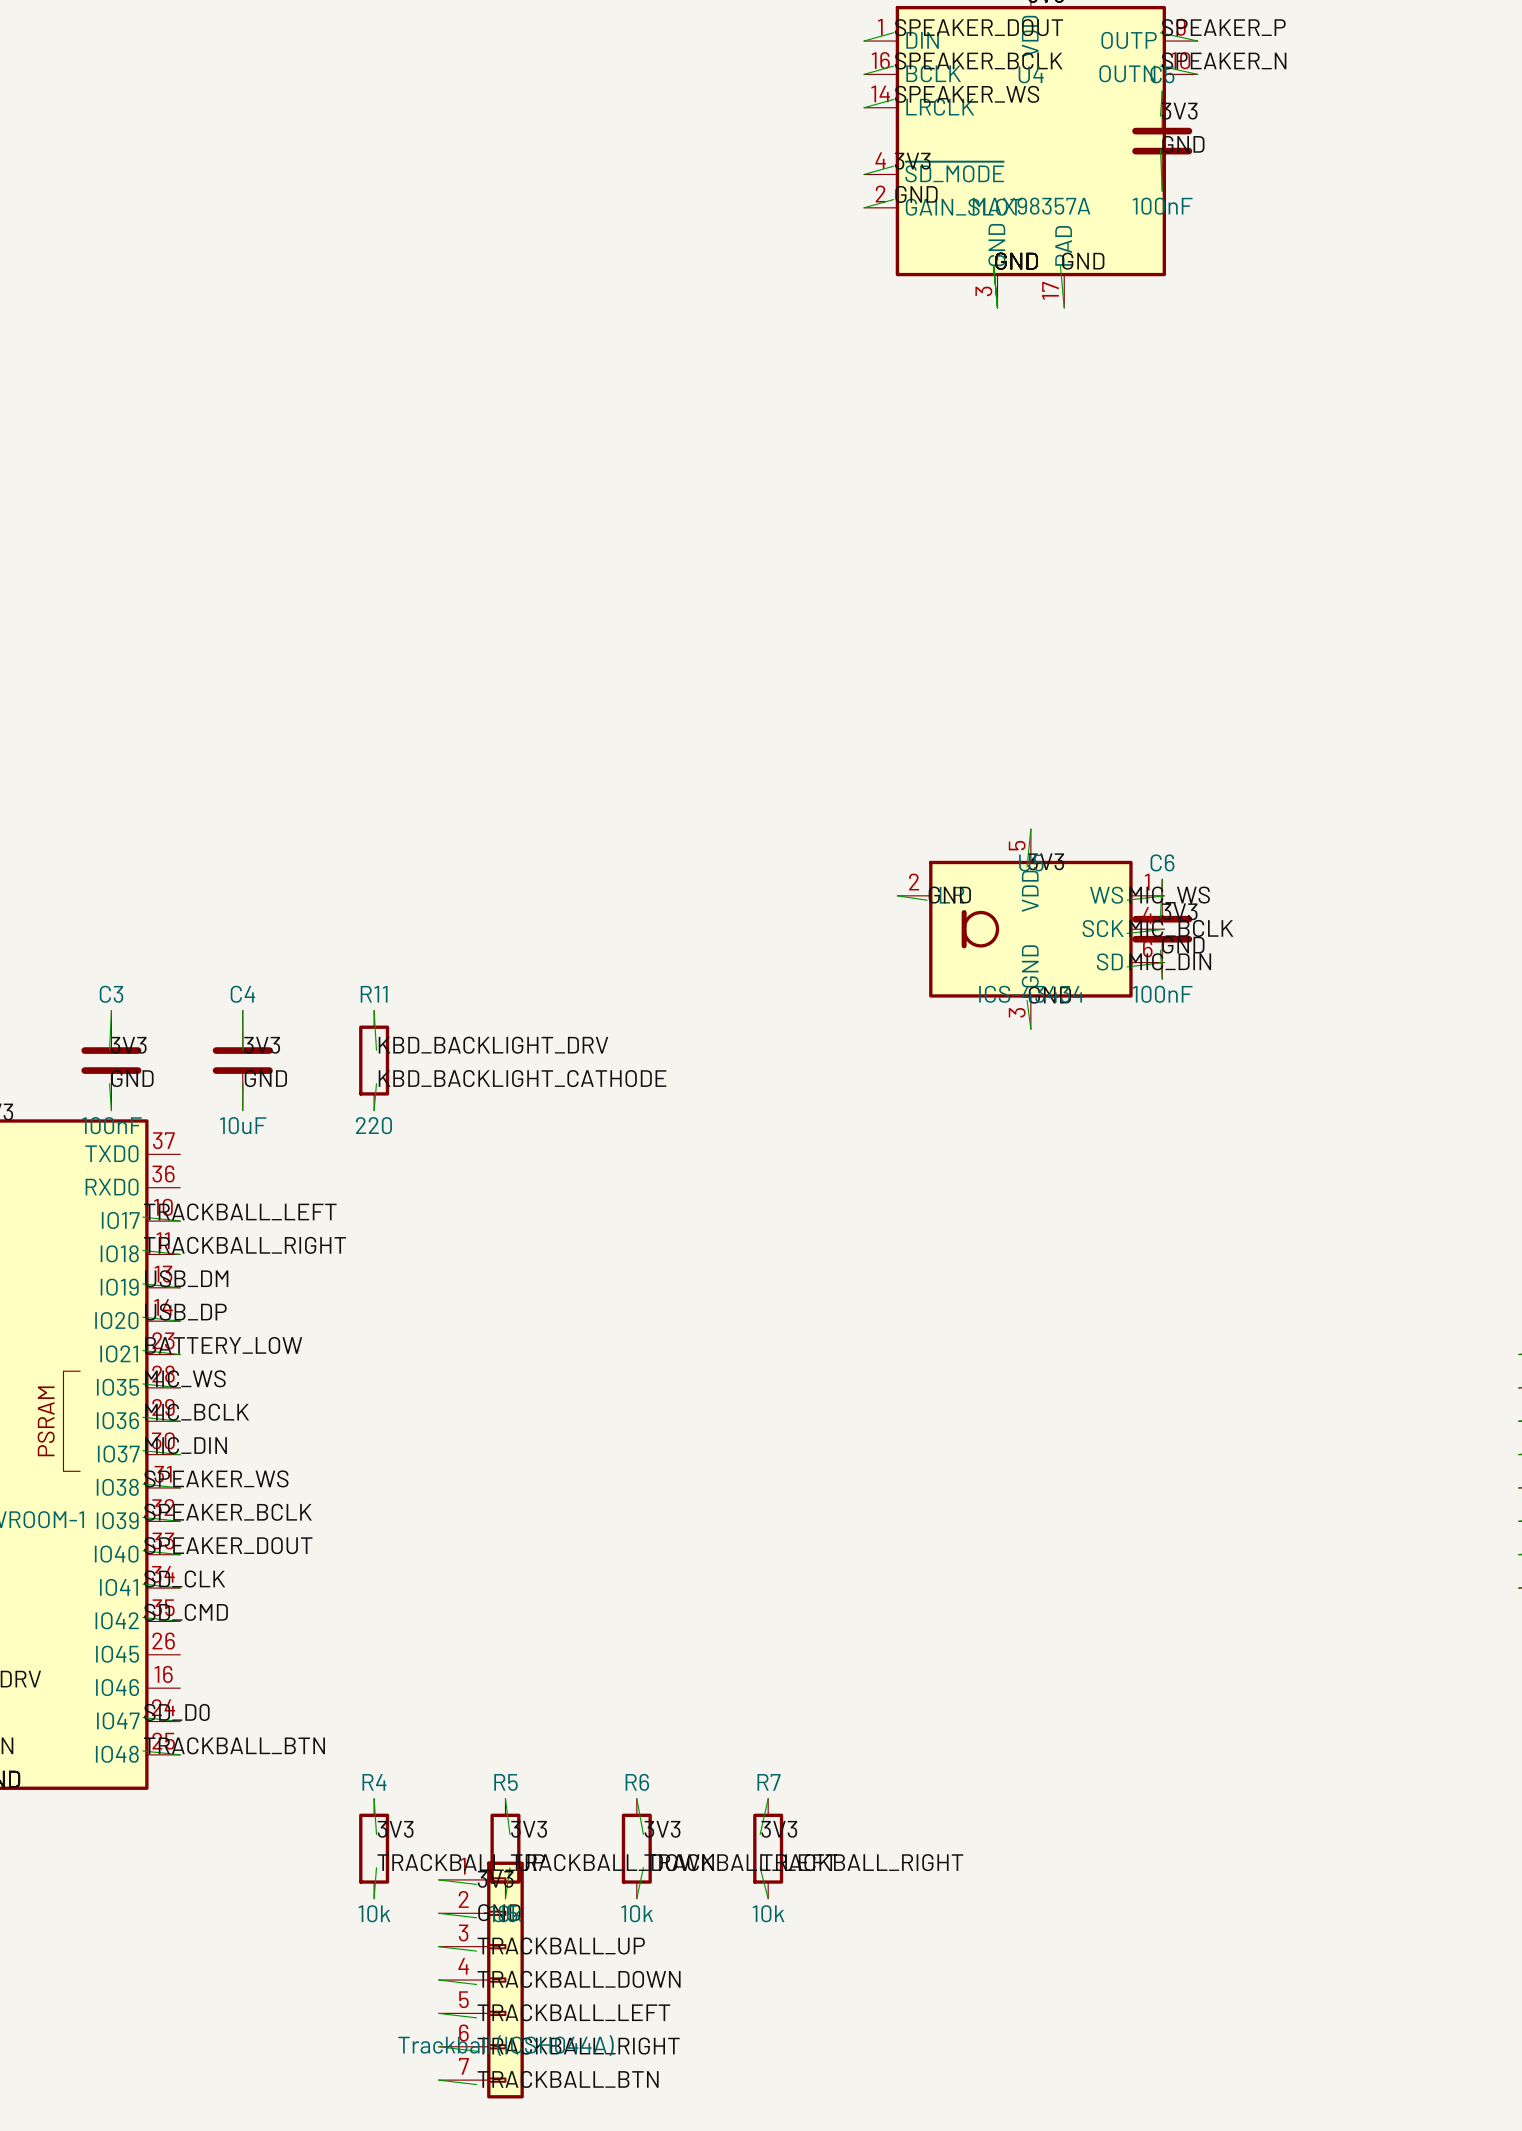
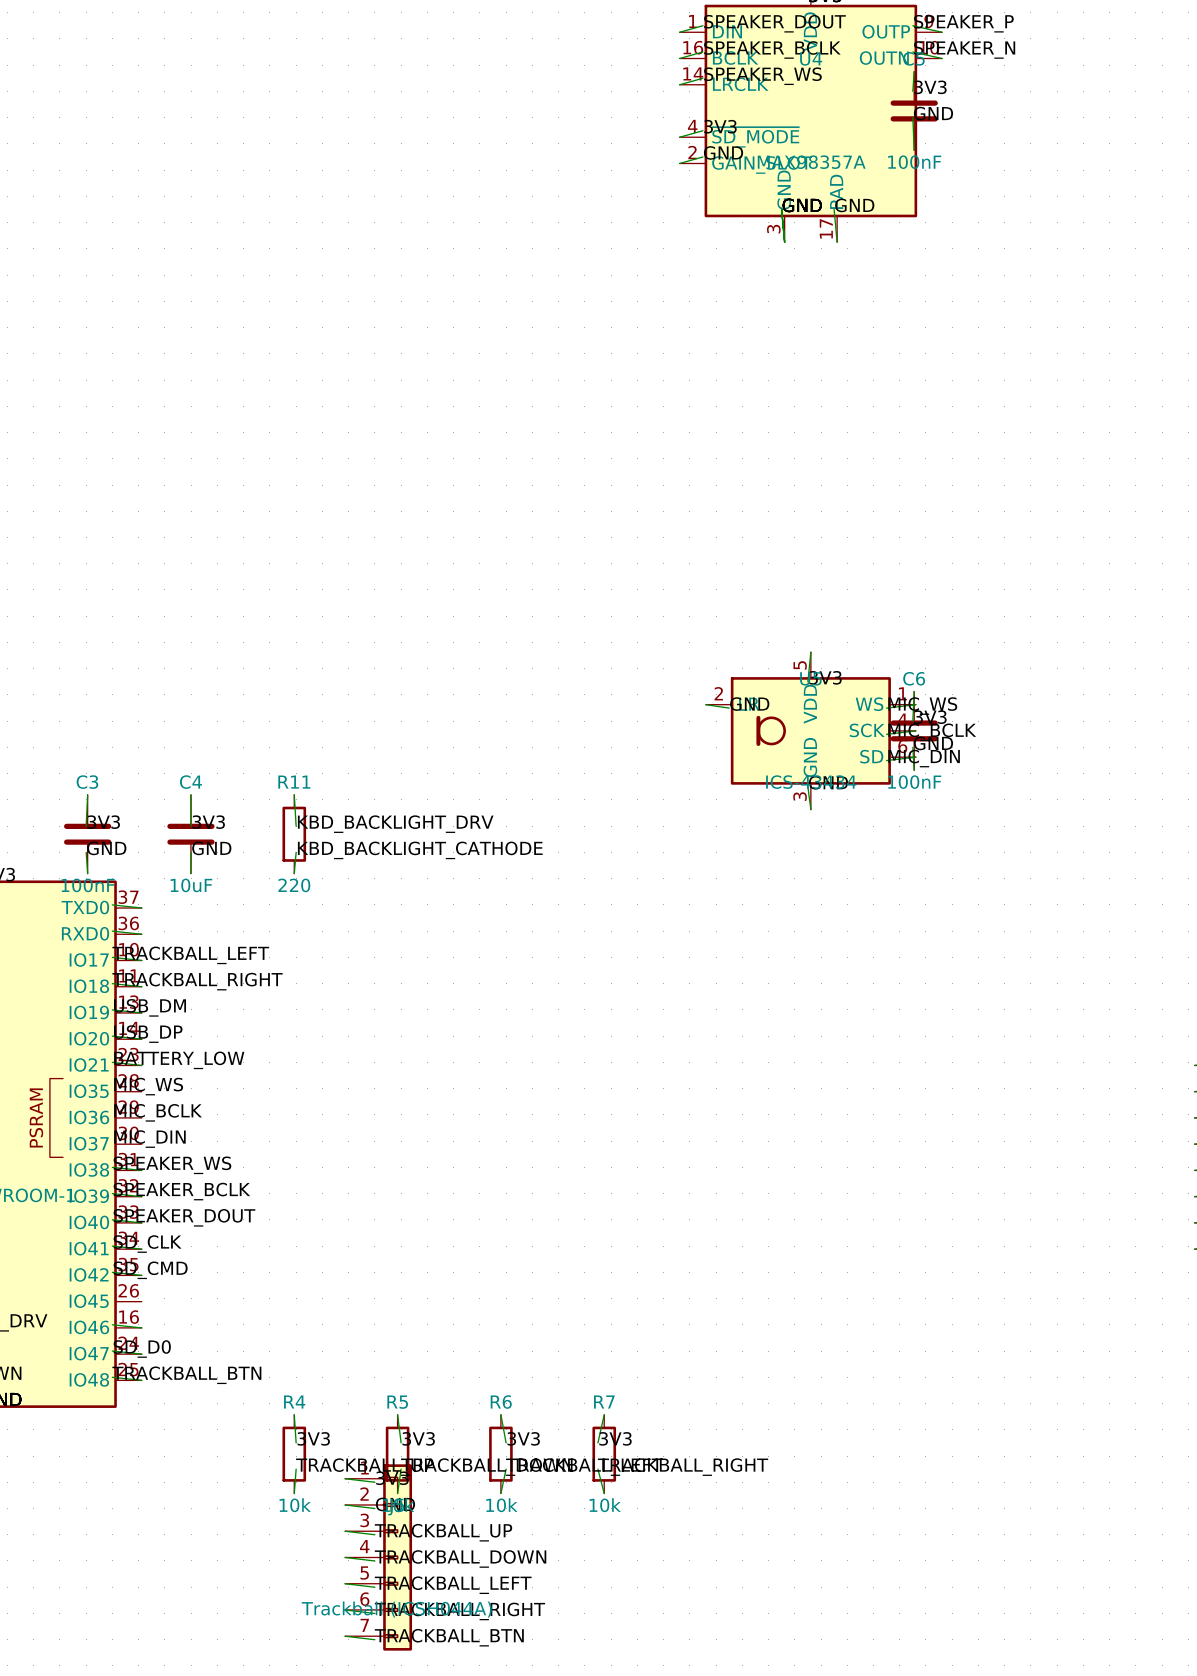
wire: (142, 1383) (180, 1387) -> (112, 904) (141, 908)
wire: (142, 1417) (180, 1421) -> (112, 931) (141, 934)
wire: (142, 1450) (180, 1454) -> (112, 1324) (141, 1327)

